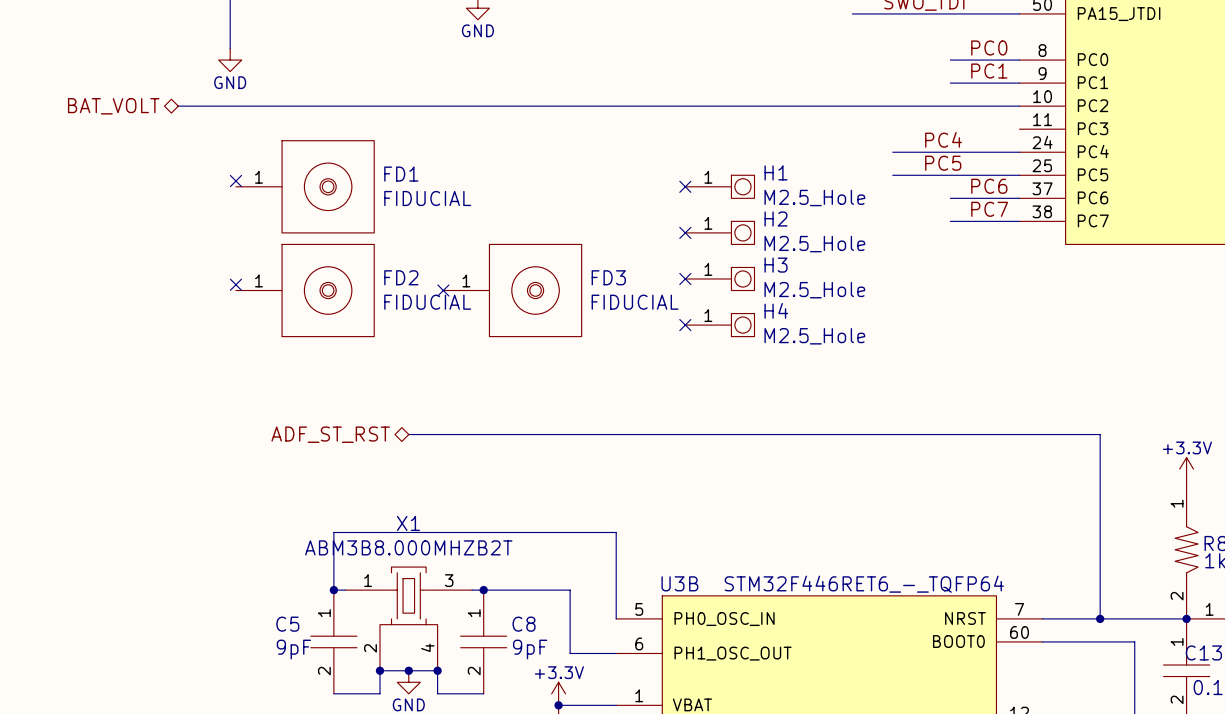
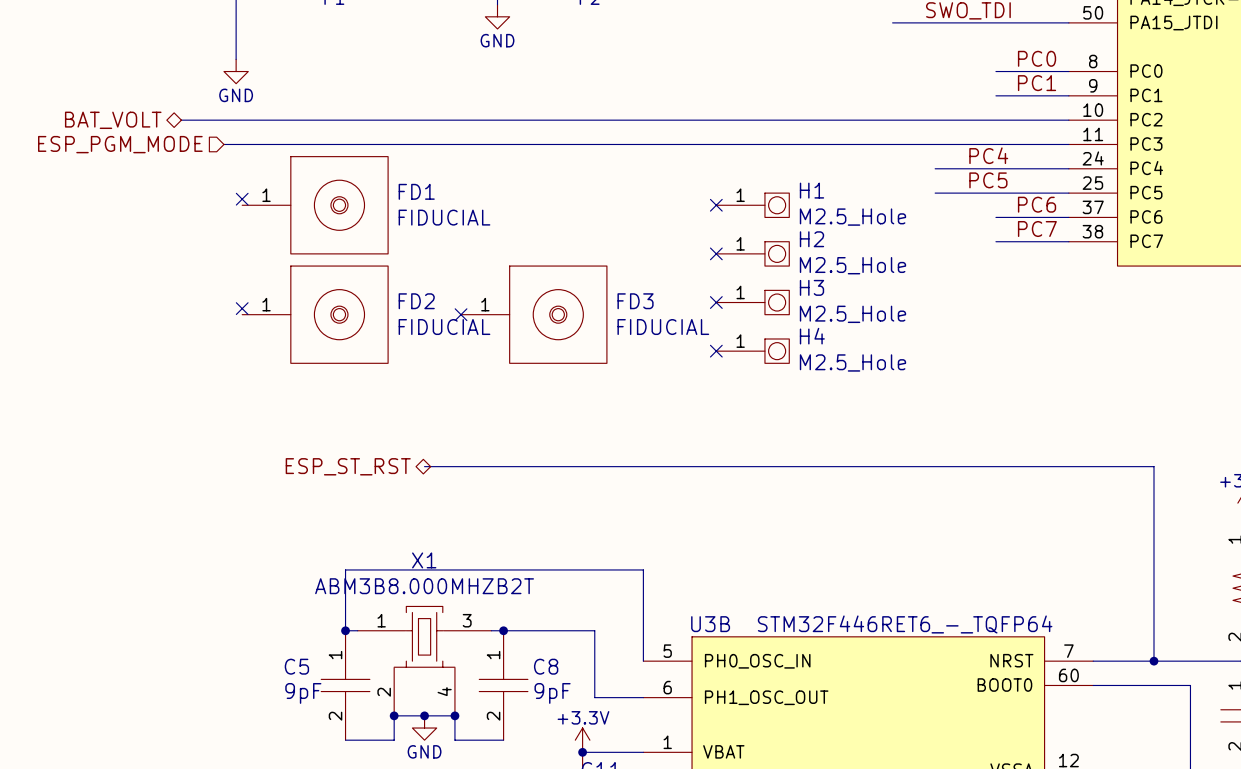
hierarchical label: none -> ESP_PGM_MODE (120, 144)
wire: none -> (223, 144) (1068, 144)
hierarchical label: ADF_ST_RST (330, 434) -> ESP_ST_RST (348, 466)

